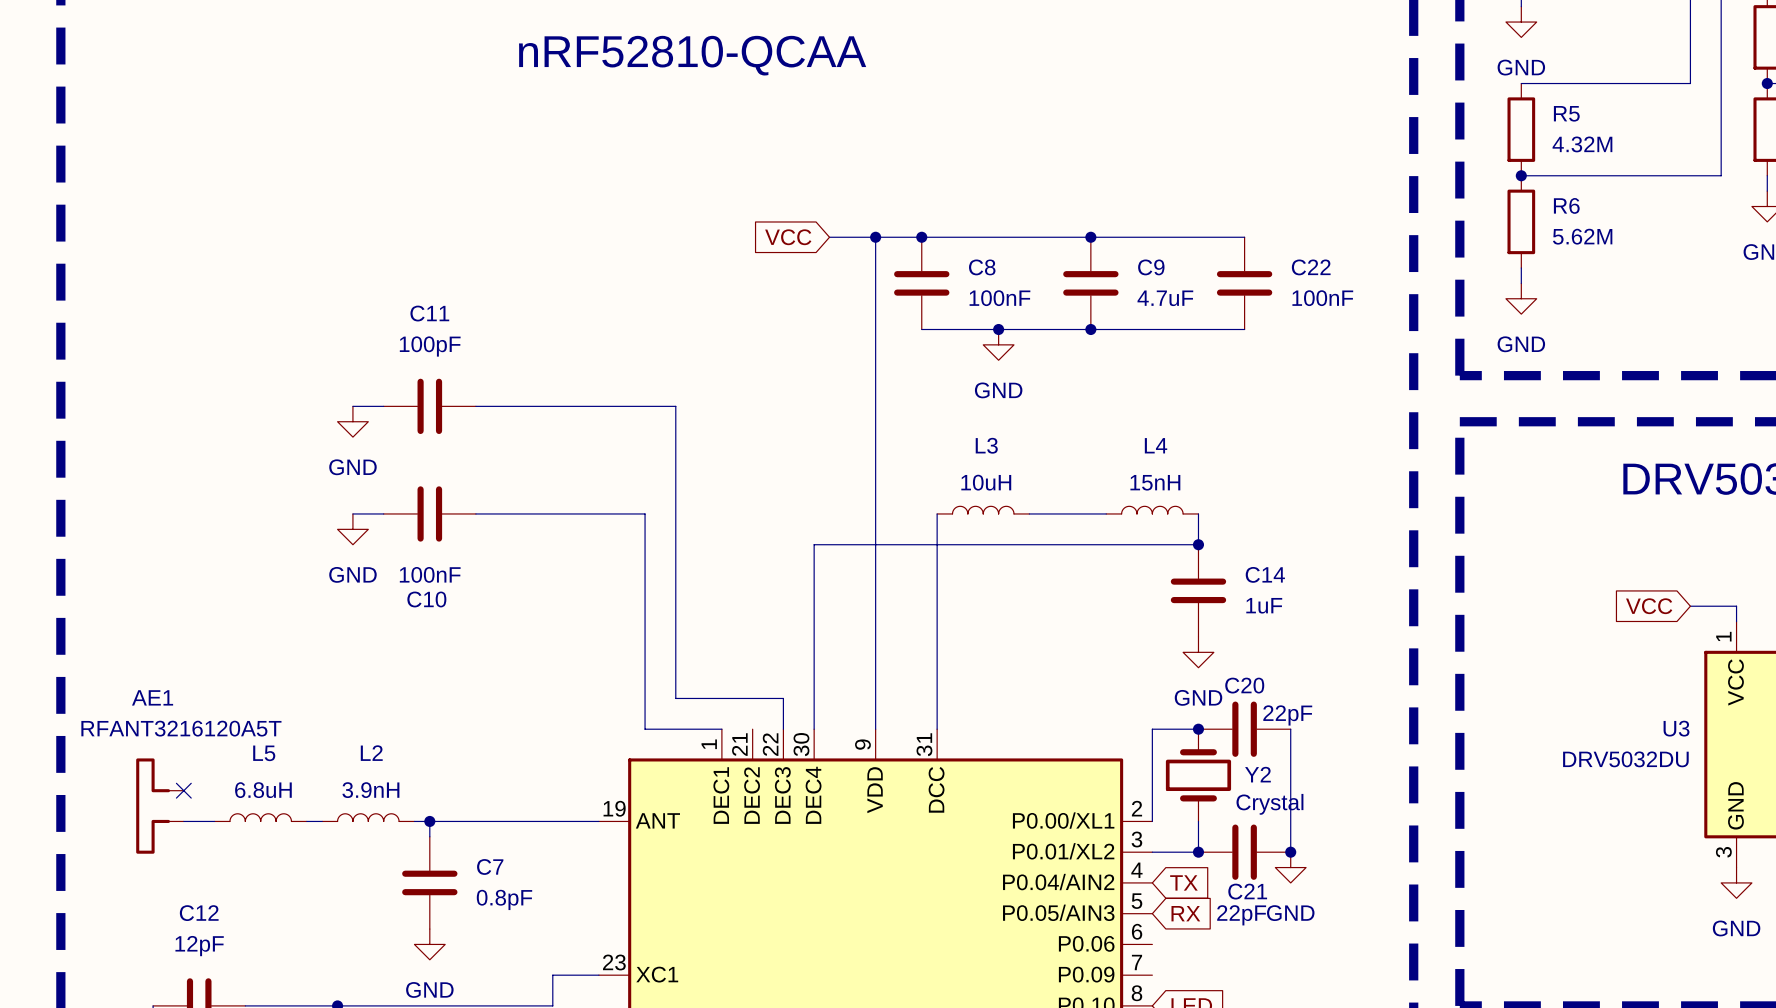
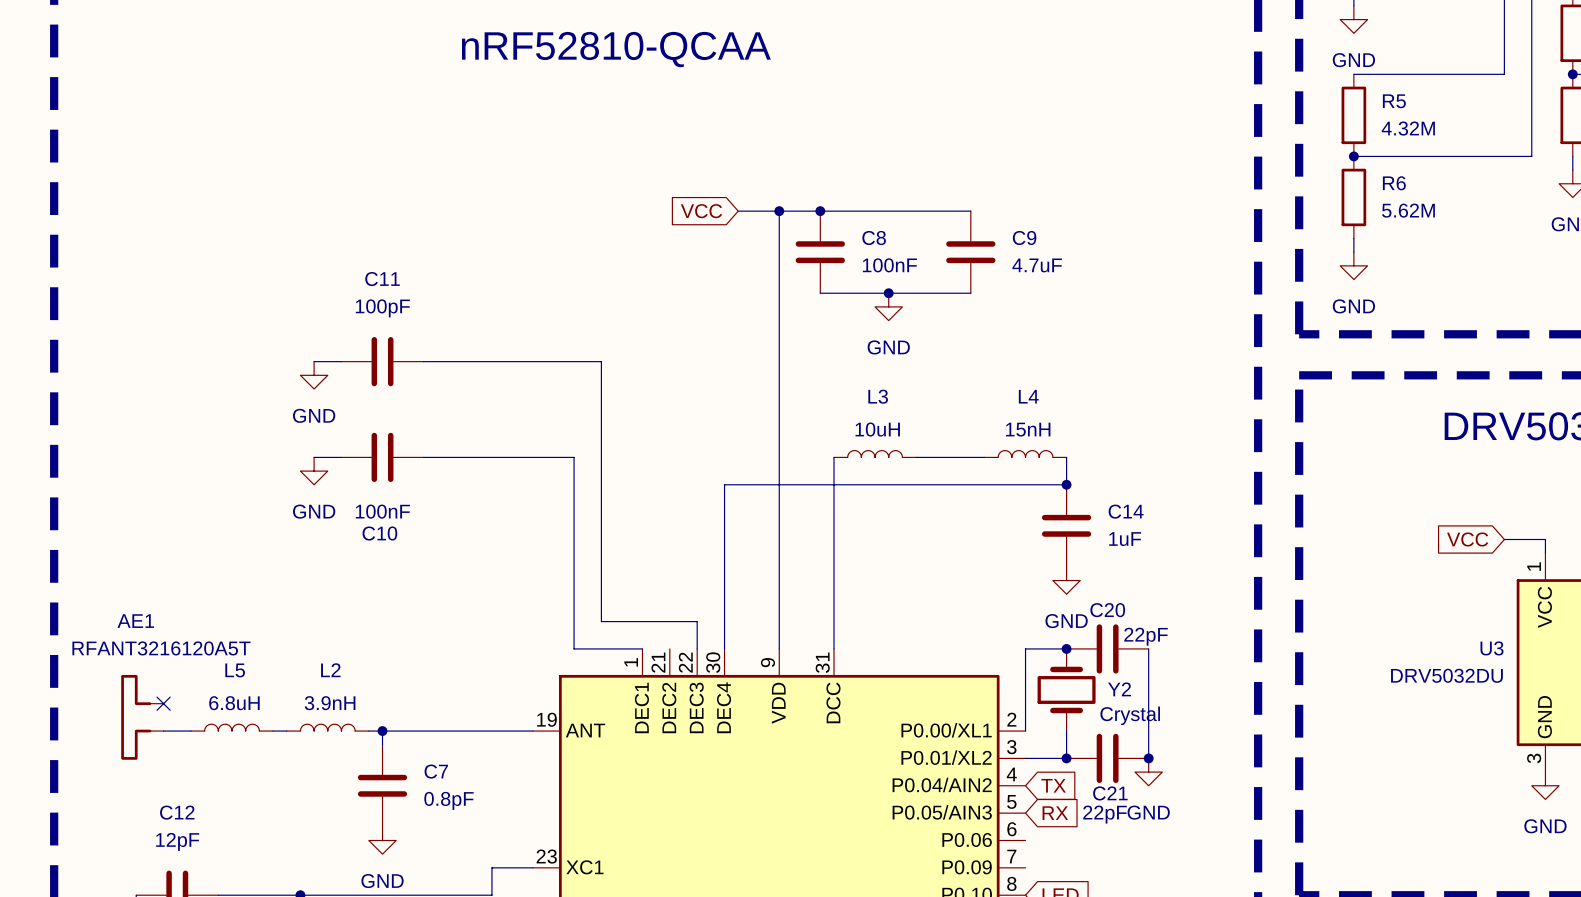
wire: (1090, 237) (1244, 237) -> none
junction: (1090, 237) -> none
C22: 100nF (1244, 283) -> none
wire: (1090, 329) (1244, 329) -> none
junction: (1090, 329) -> none

